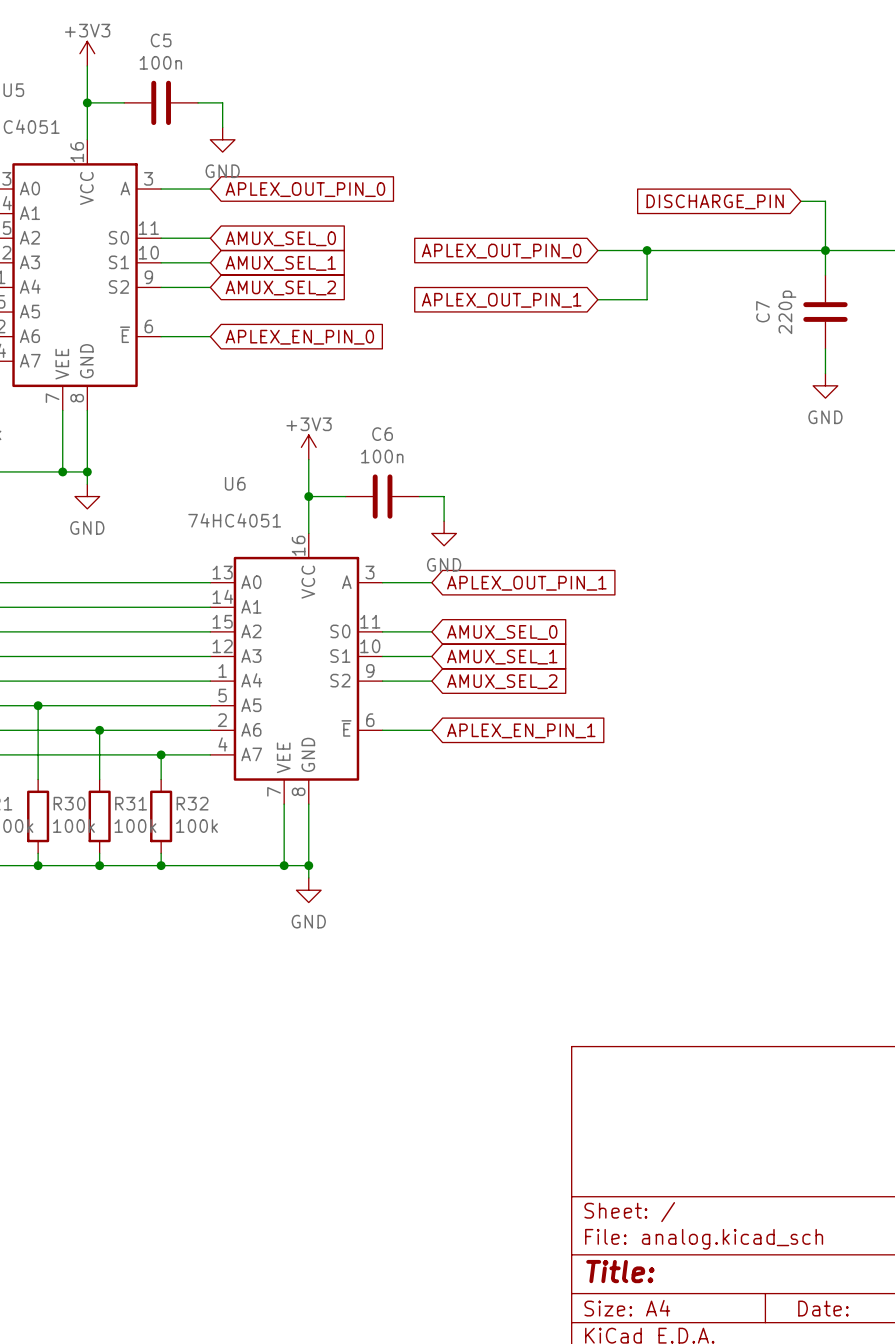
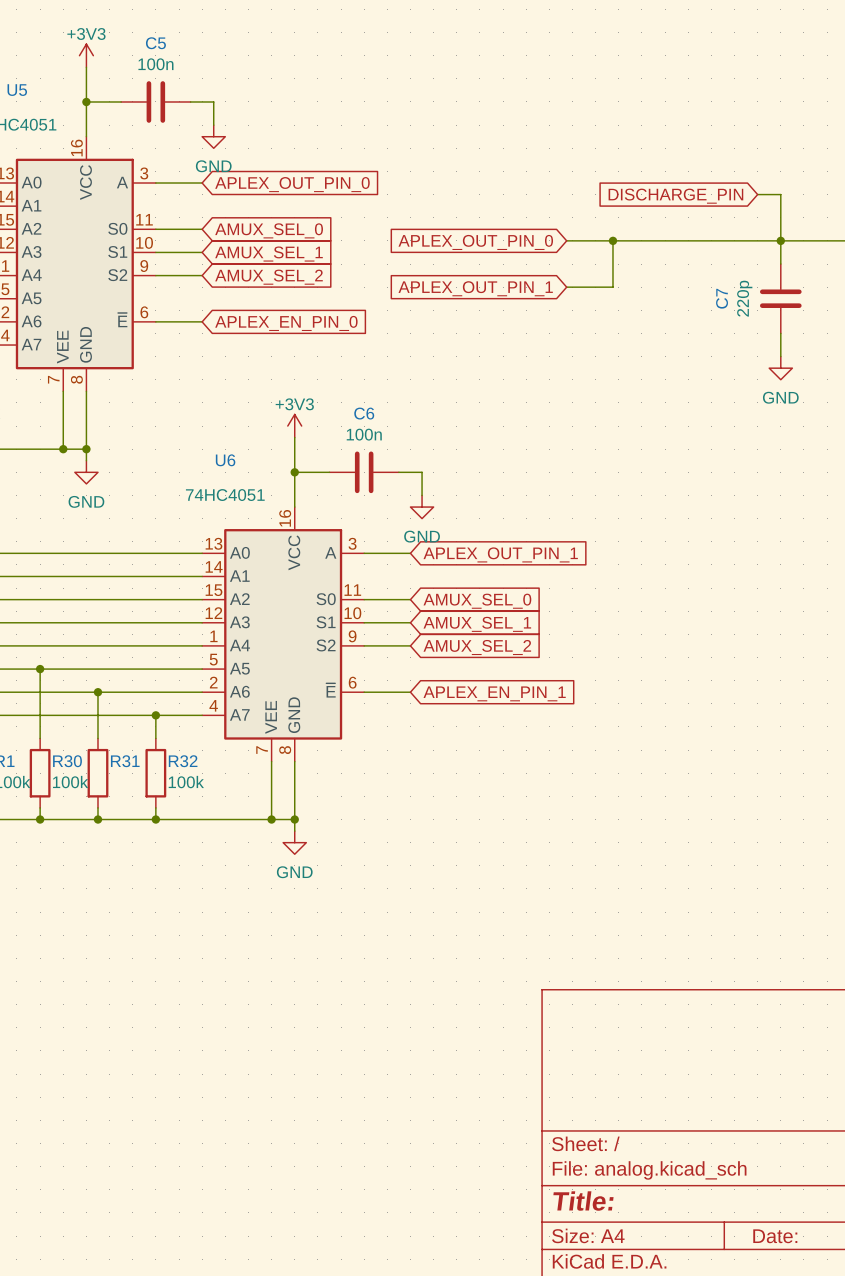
R31 value: 100k (135, 826) -> none

